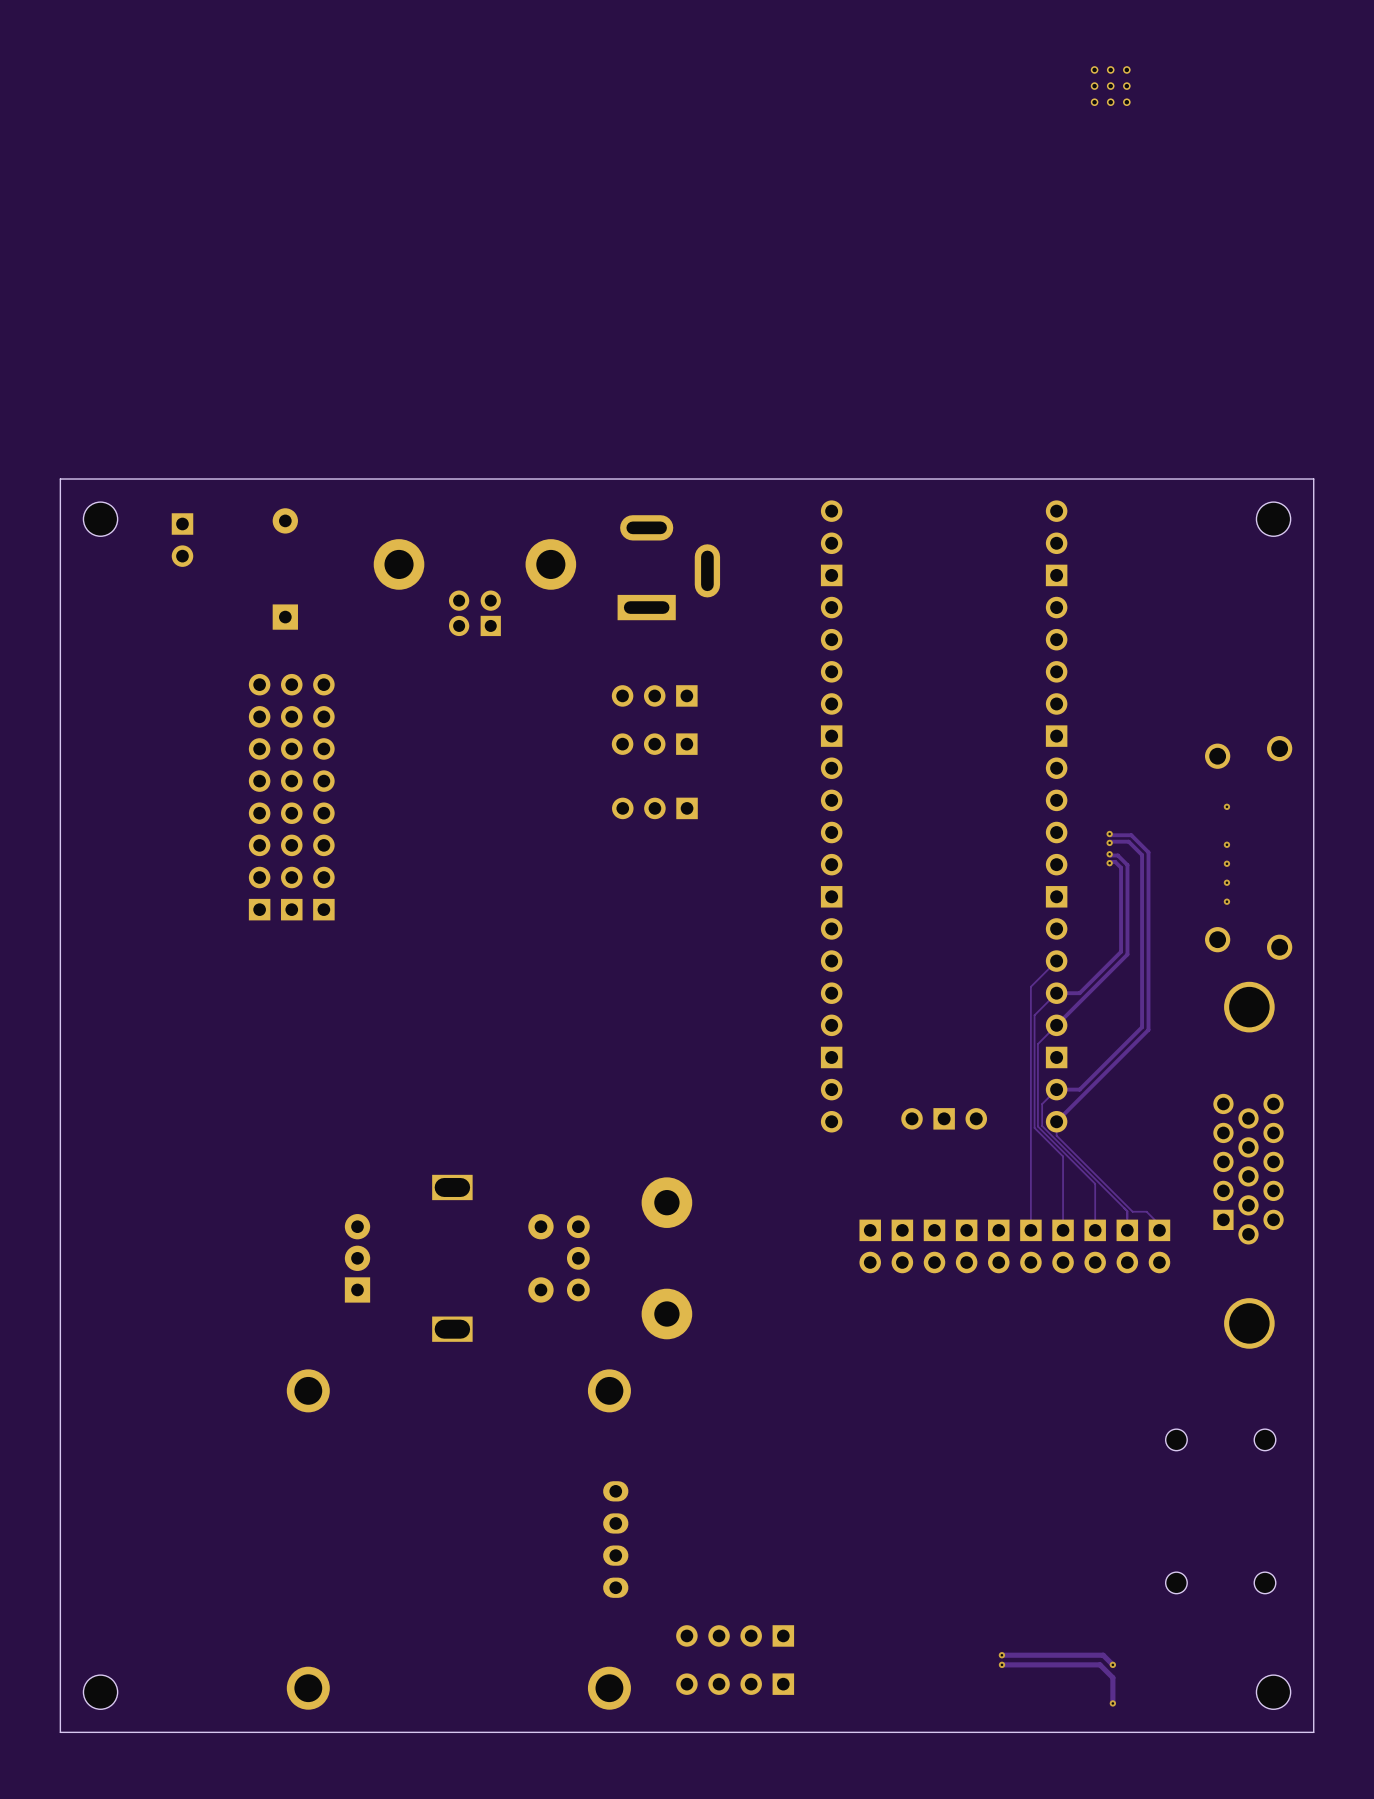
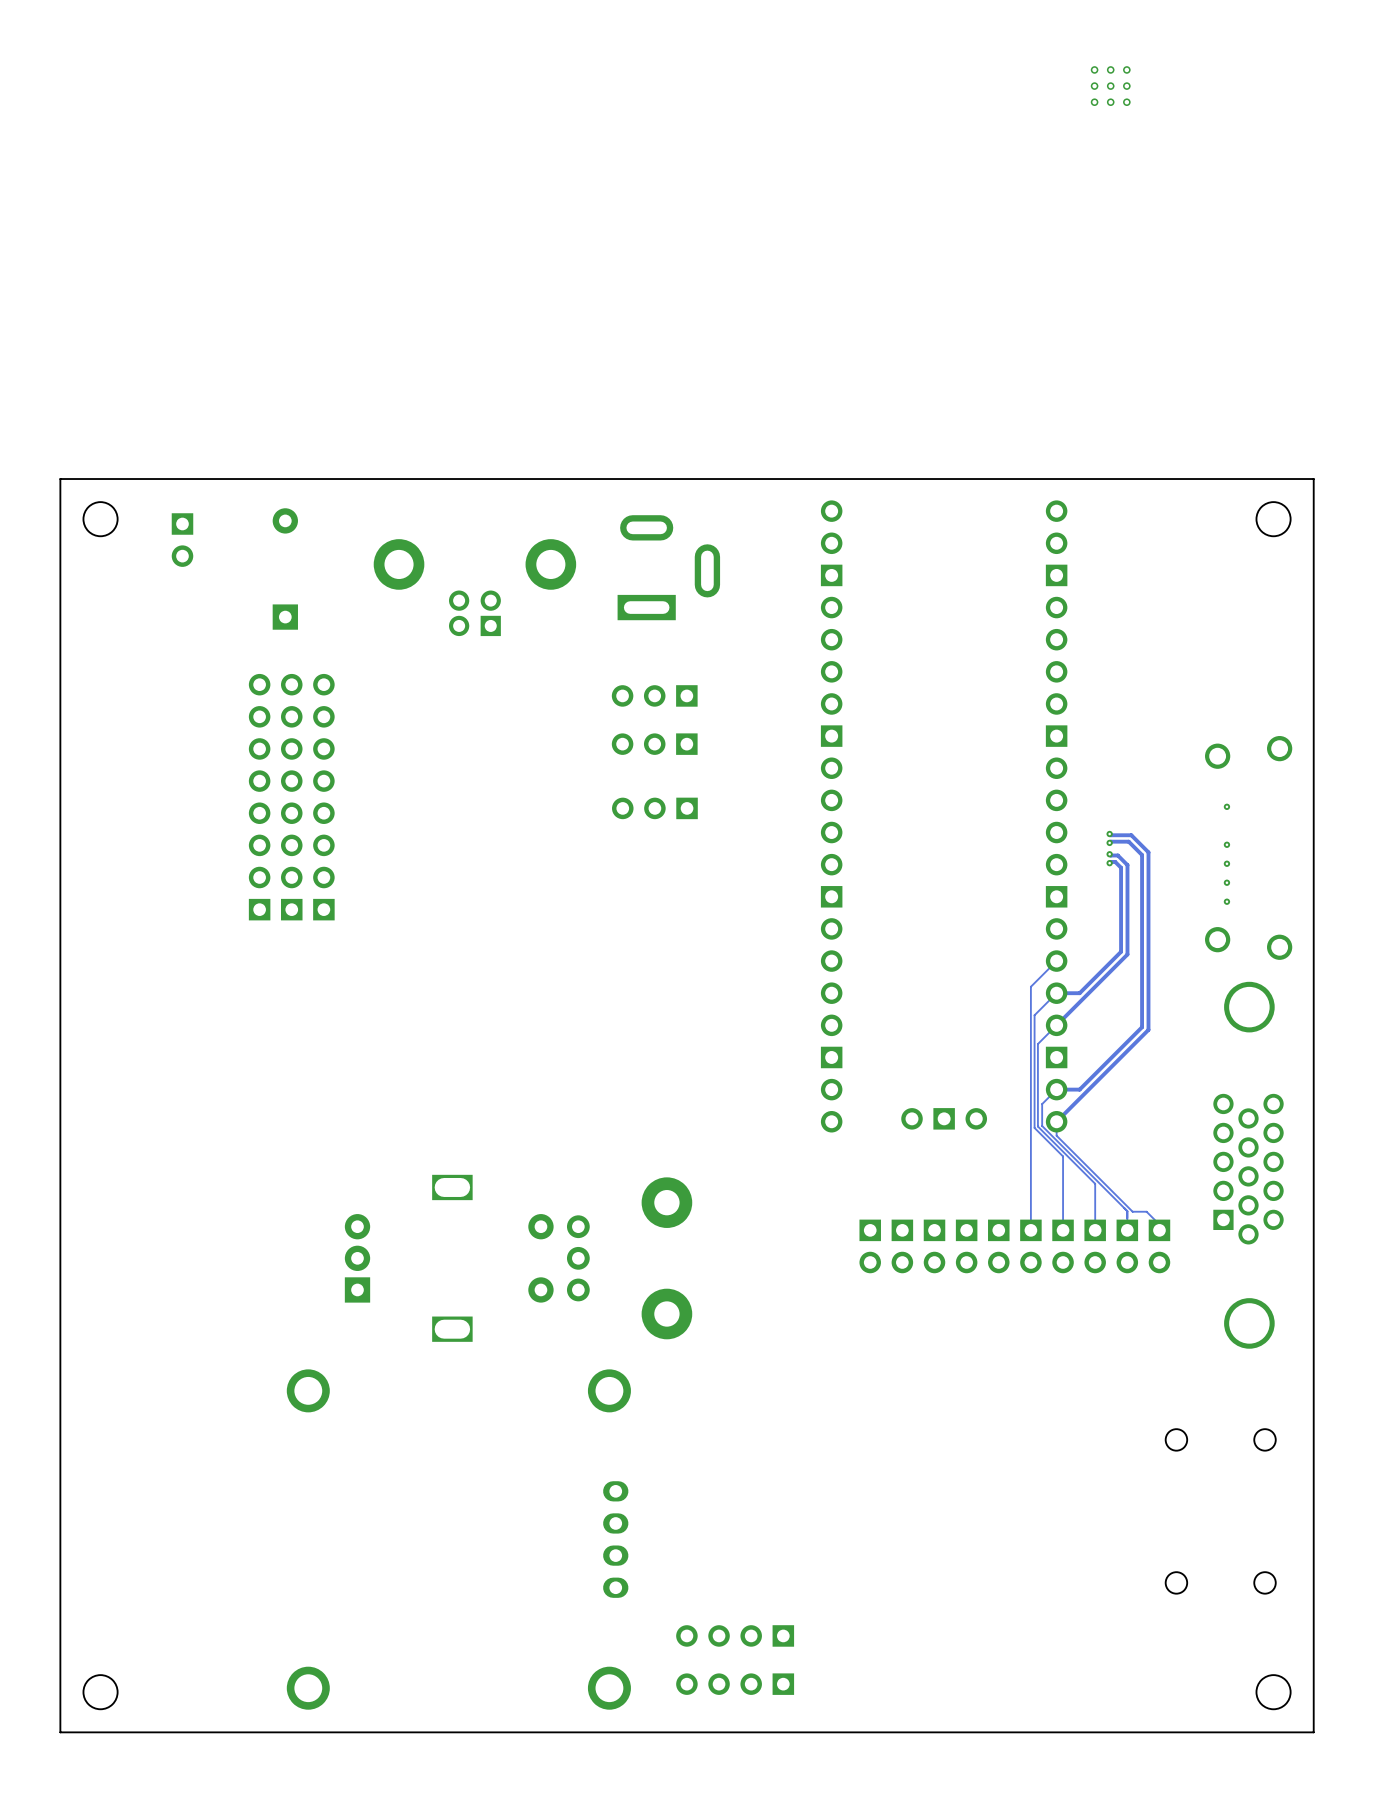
track: (1001, 1655) (1103, 1655) (1112, 1664) -> none
via: (1001, 1655) -> none
track: (1001, 1664) (1100, 1664) (1112, 1677) (1112, 1703) -> none
via: (1001, 1664) -> none
via: (1112, 1664) -> none
via: (1112, 1703) -> none

